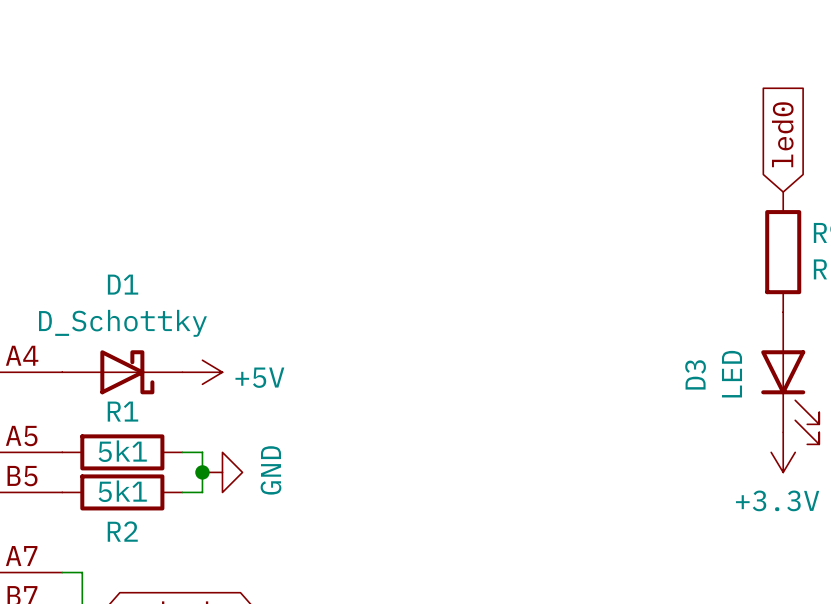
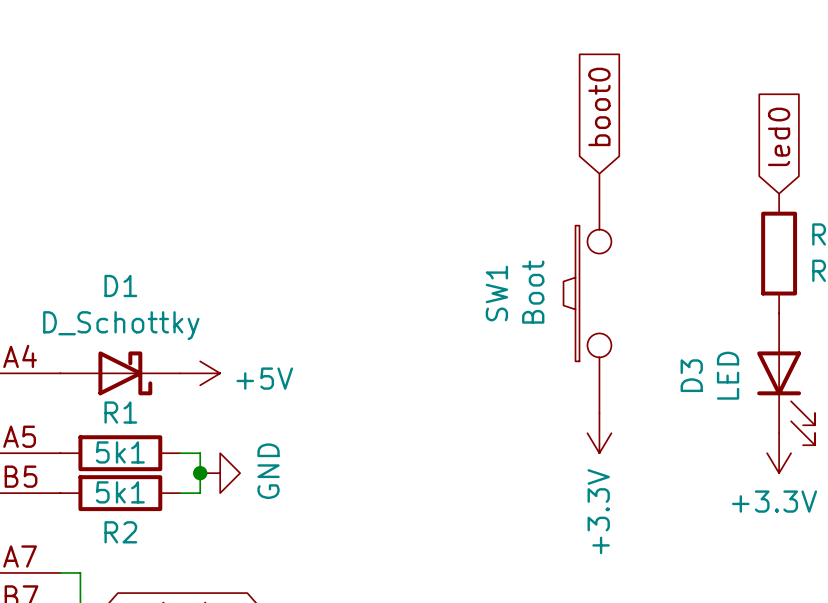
global label: none -> boot0 (599, 106)
SW1: none -> Boot (587, 293)
power symbol: none -> +3.3V (599, 433)

